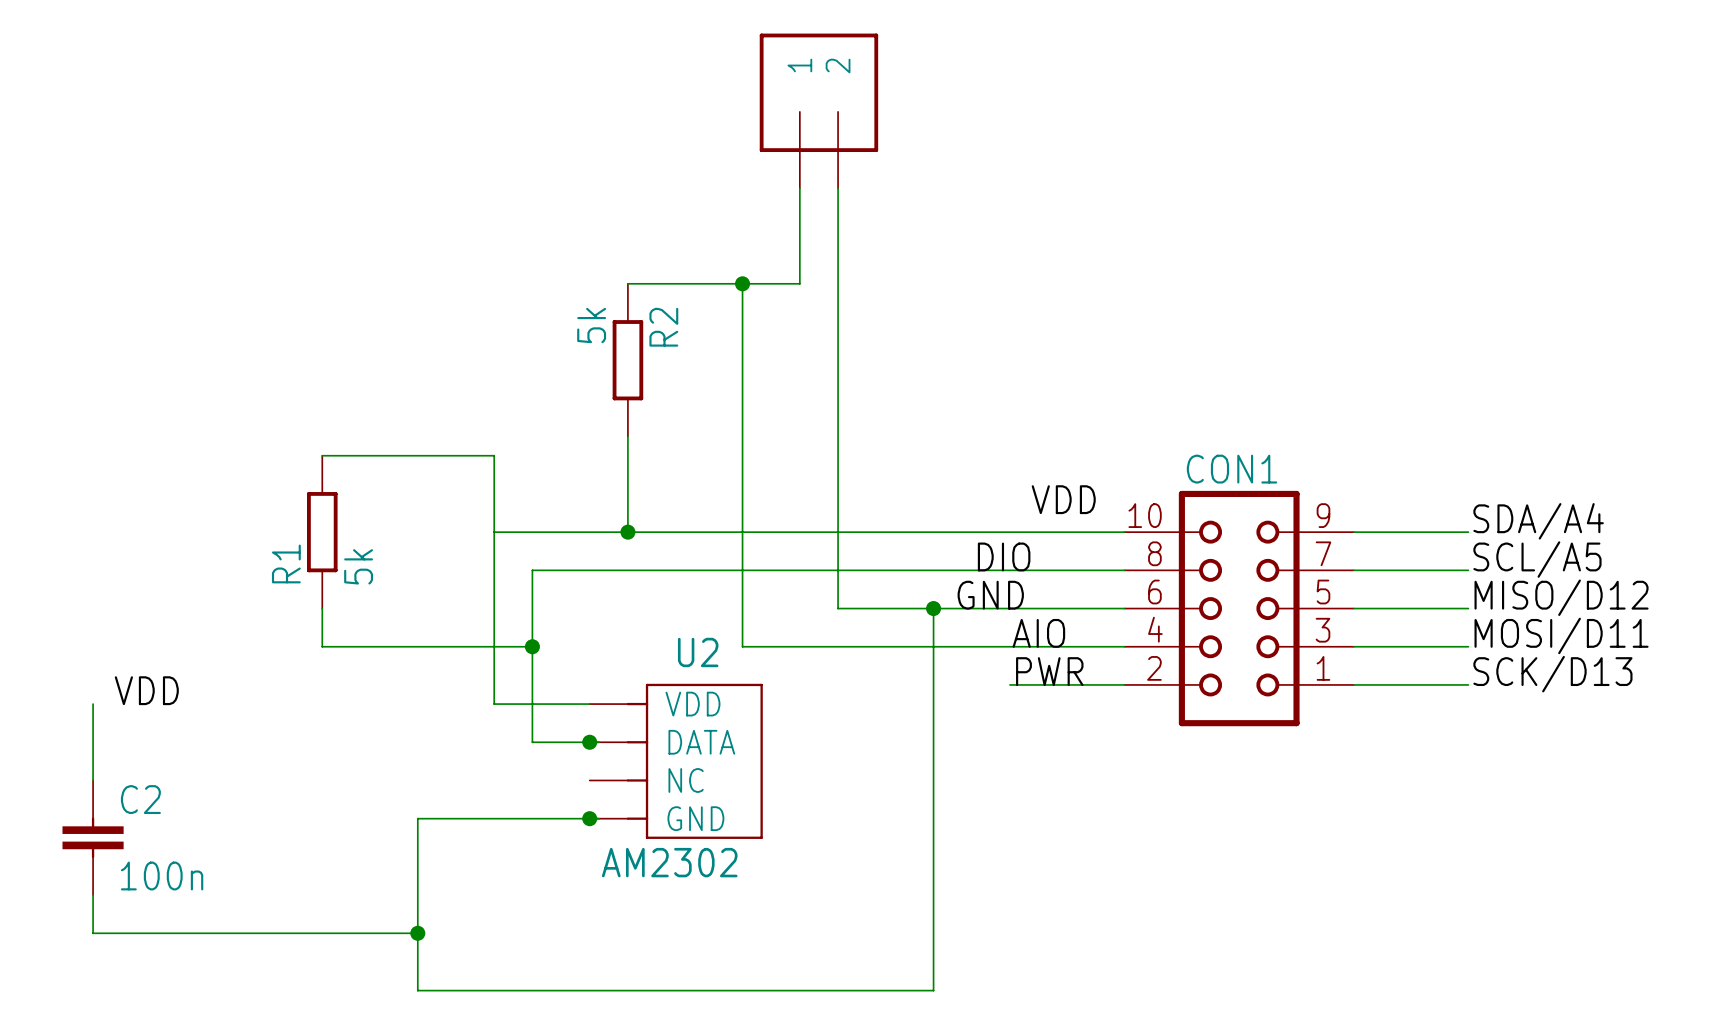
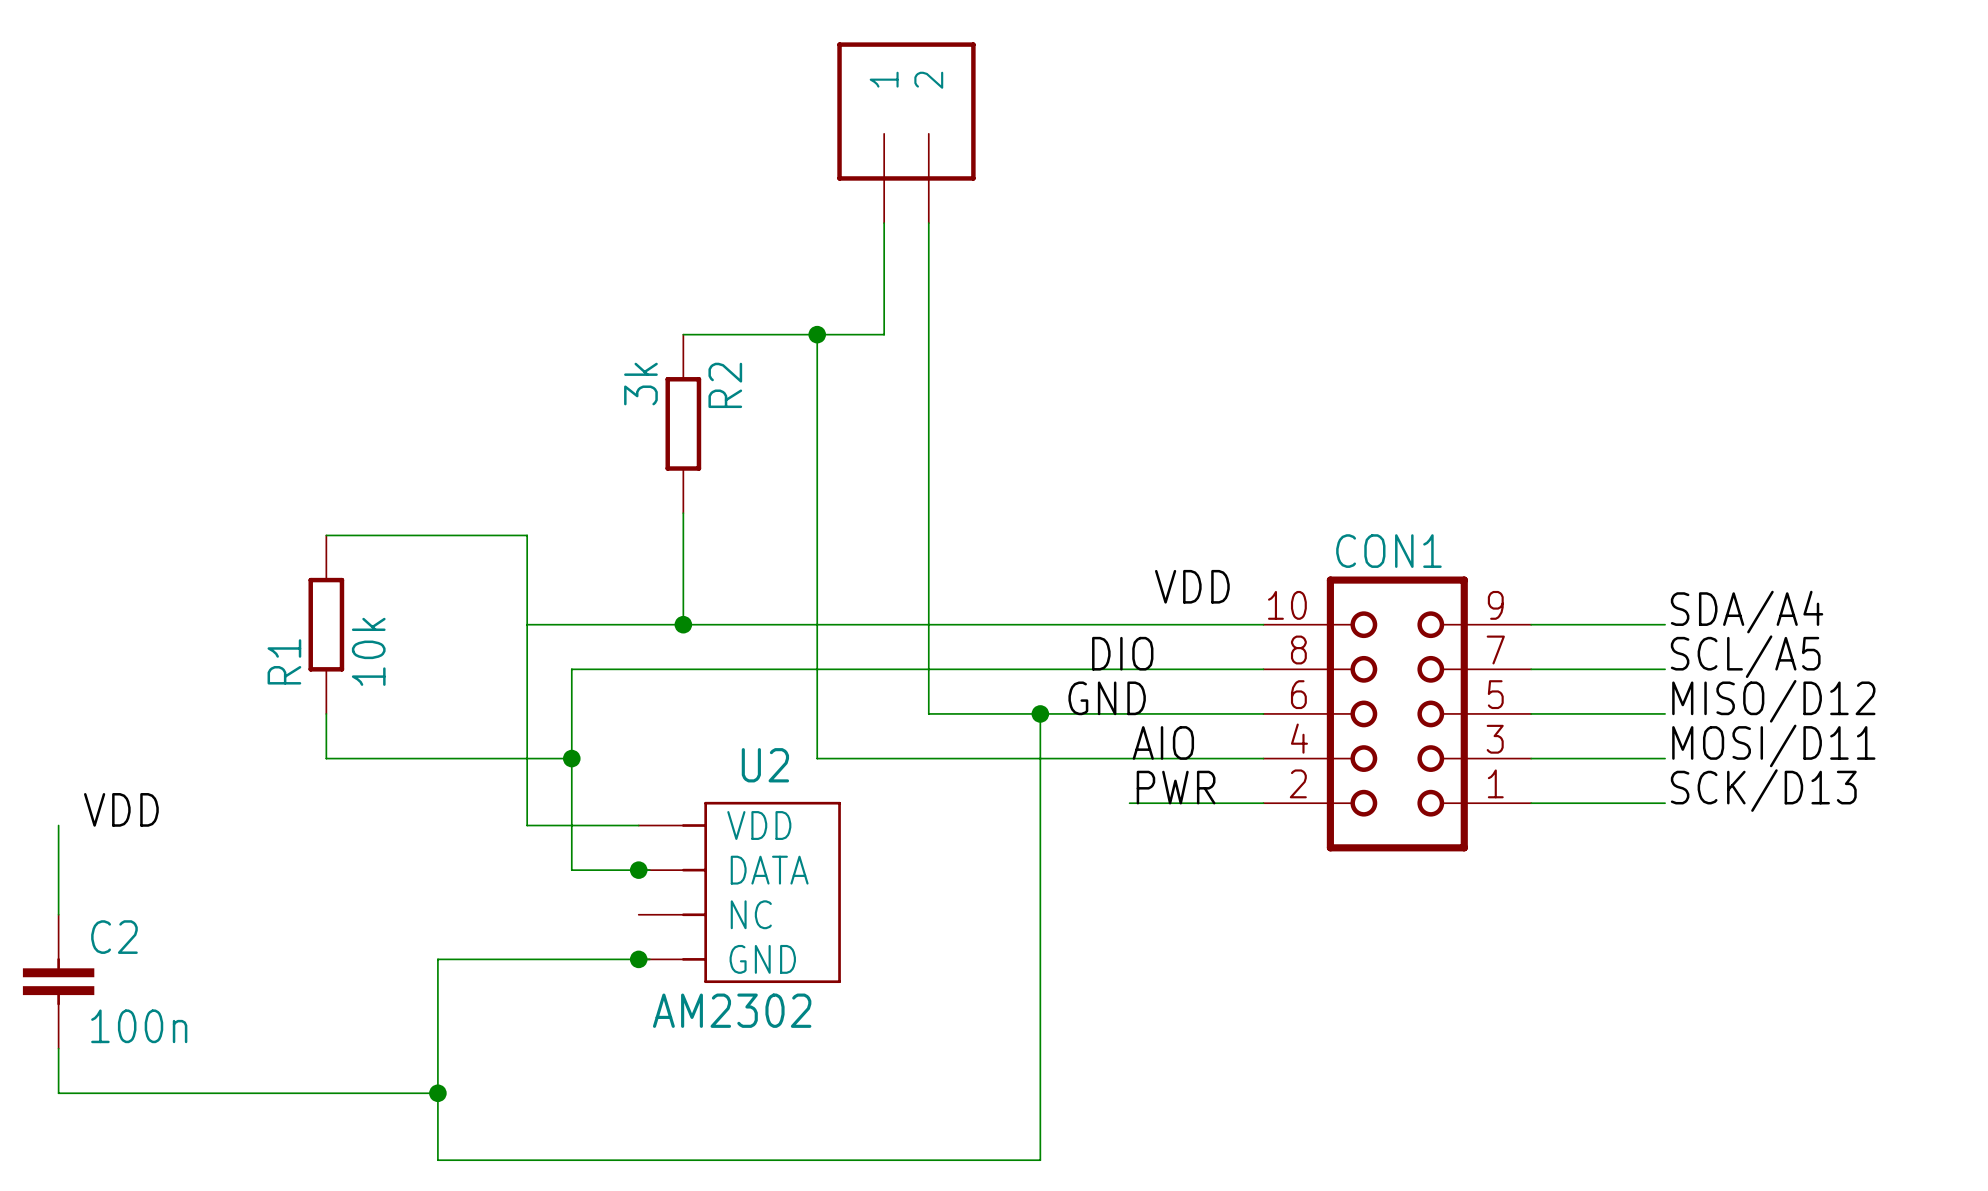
R2 value: 5k (591, 325) -> 3k (640, 384)
R1 value: 5k (358, 566) -> 10k (368, 651)

